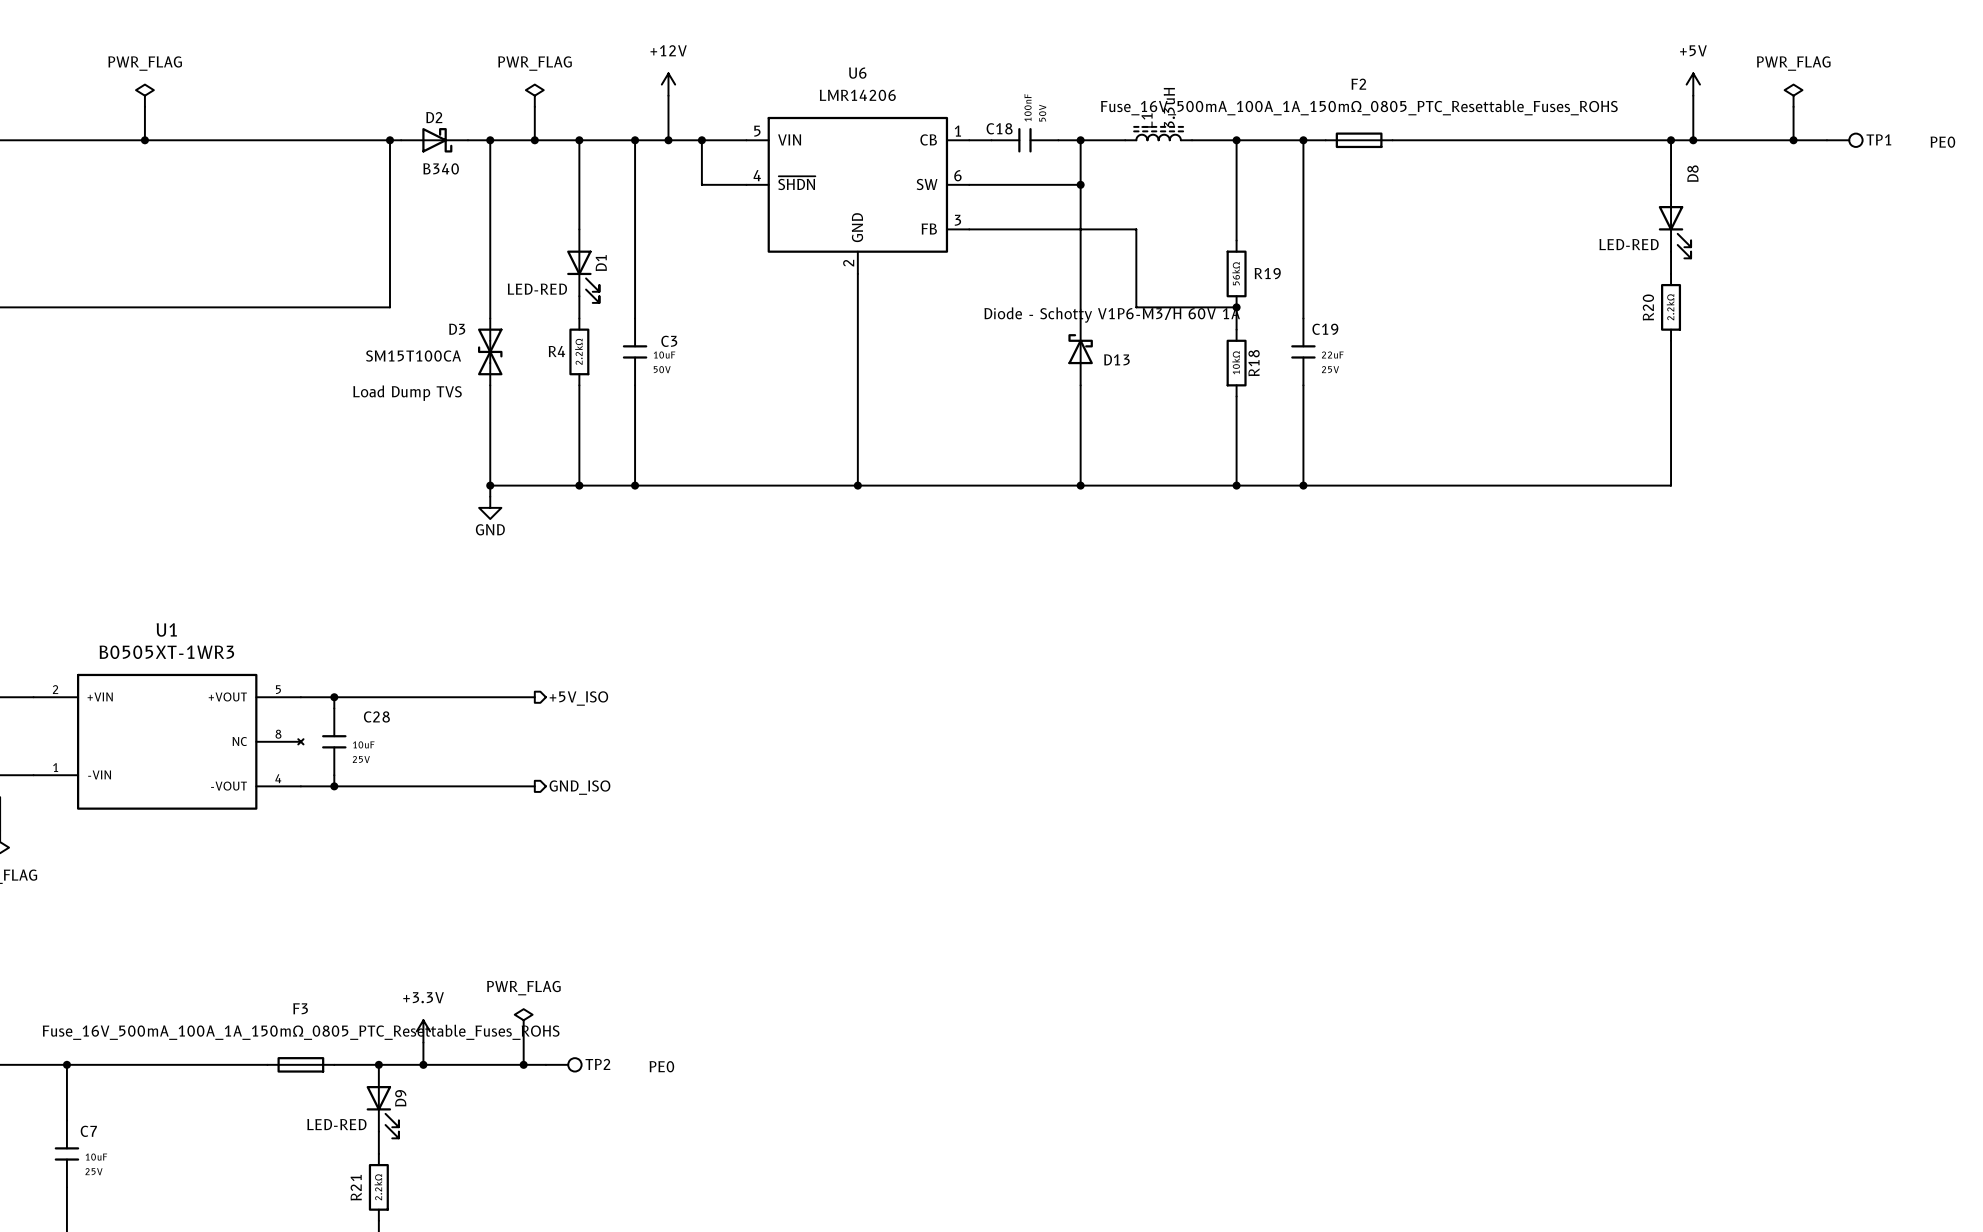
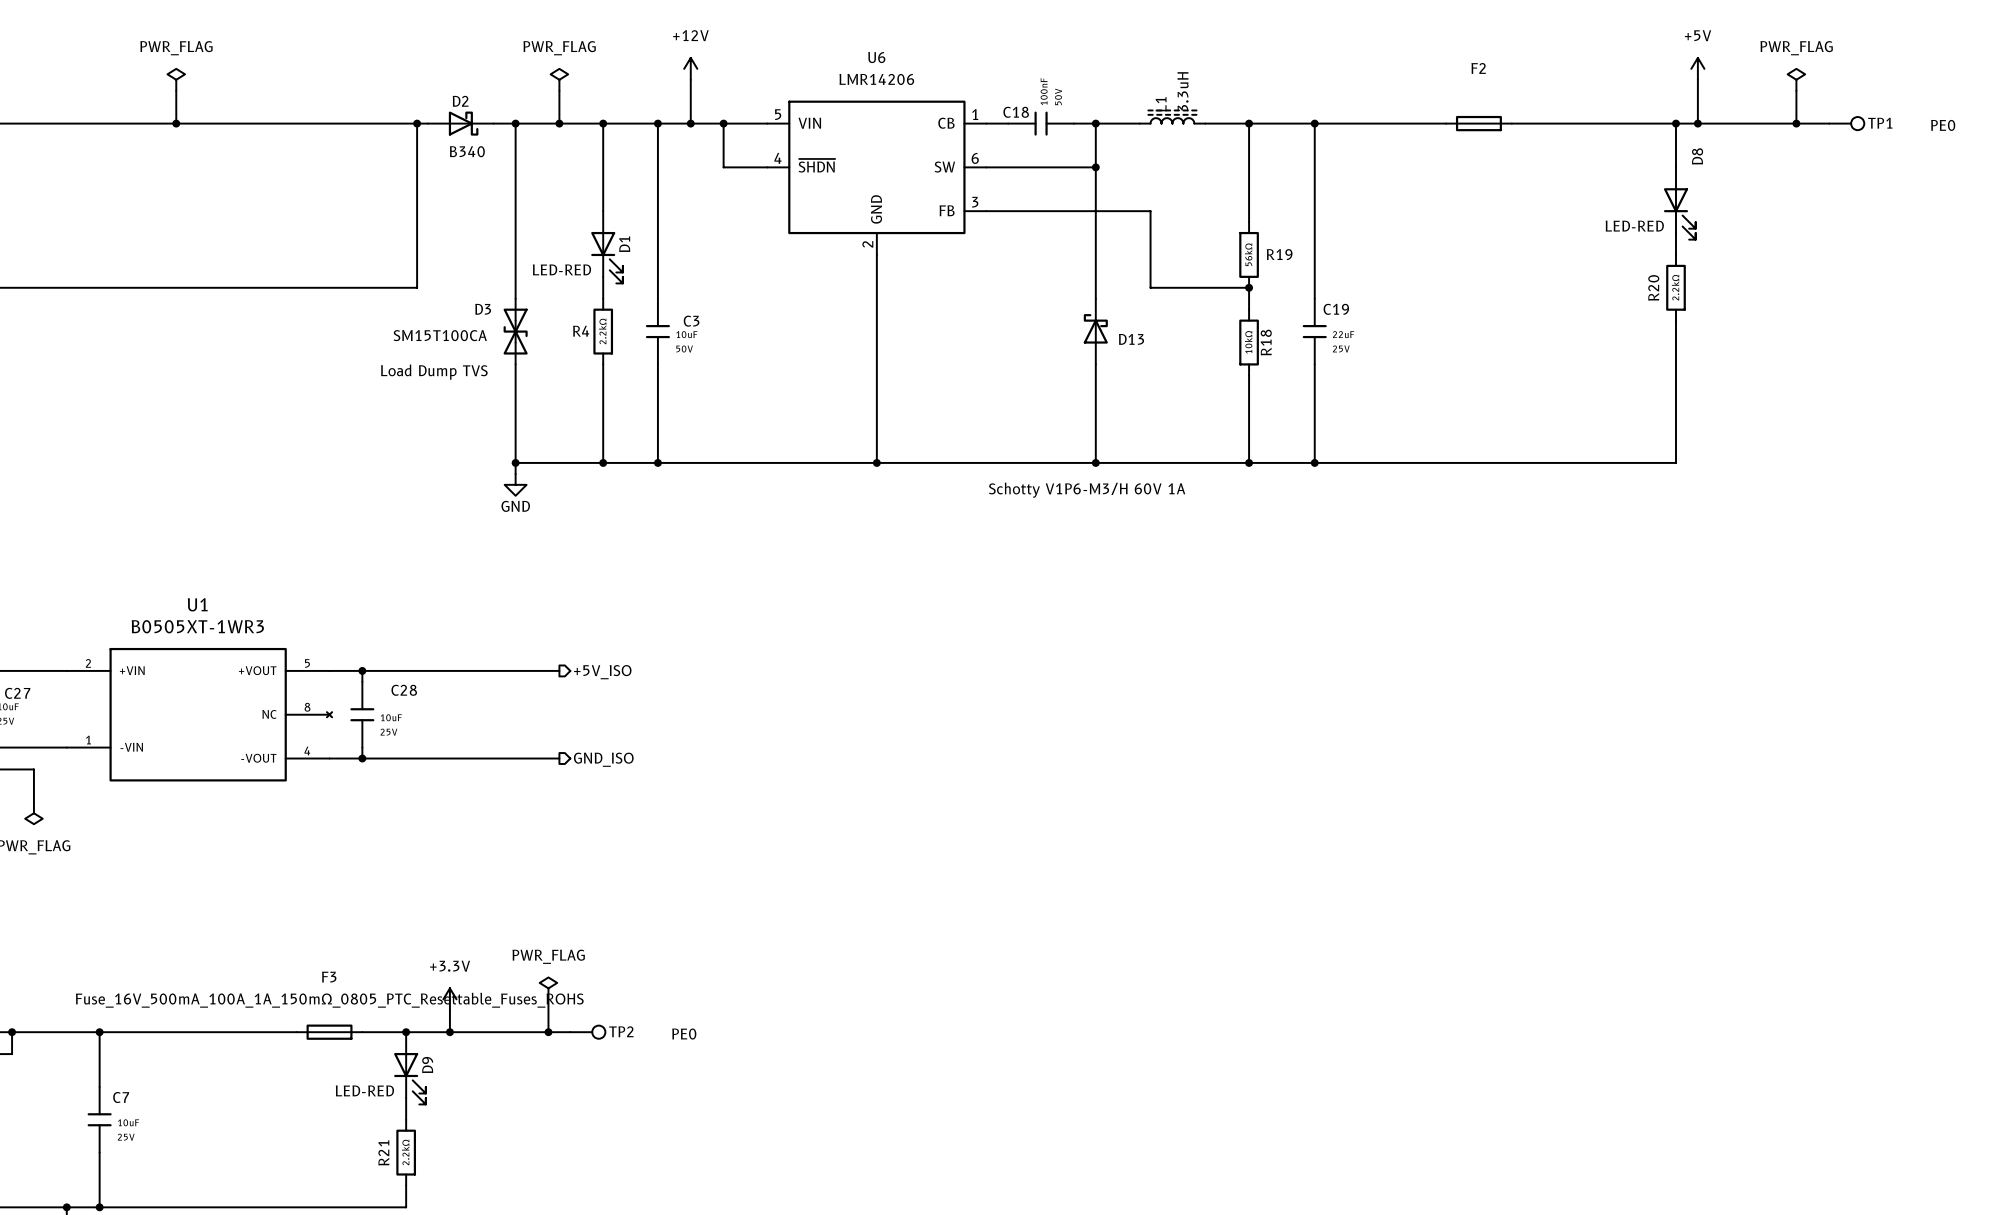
F2 value: Fuse_16V_500mA_100A_1A_150mΩ_0805_PTC_Resettable_Fuses_ROHS (1359, 107) -> none
F2 position: (1359, 140) -> (1478, 123)
D13 value: Diode - Schotty V1P6-M3/H 60V 1A (1112, 315) -> Schotty V1P6-M3/H 60V 1A (1087, 490)

